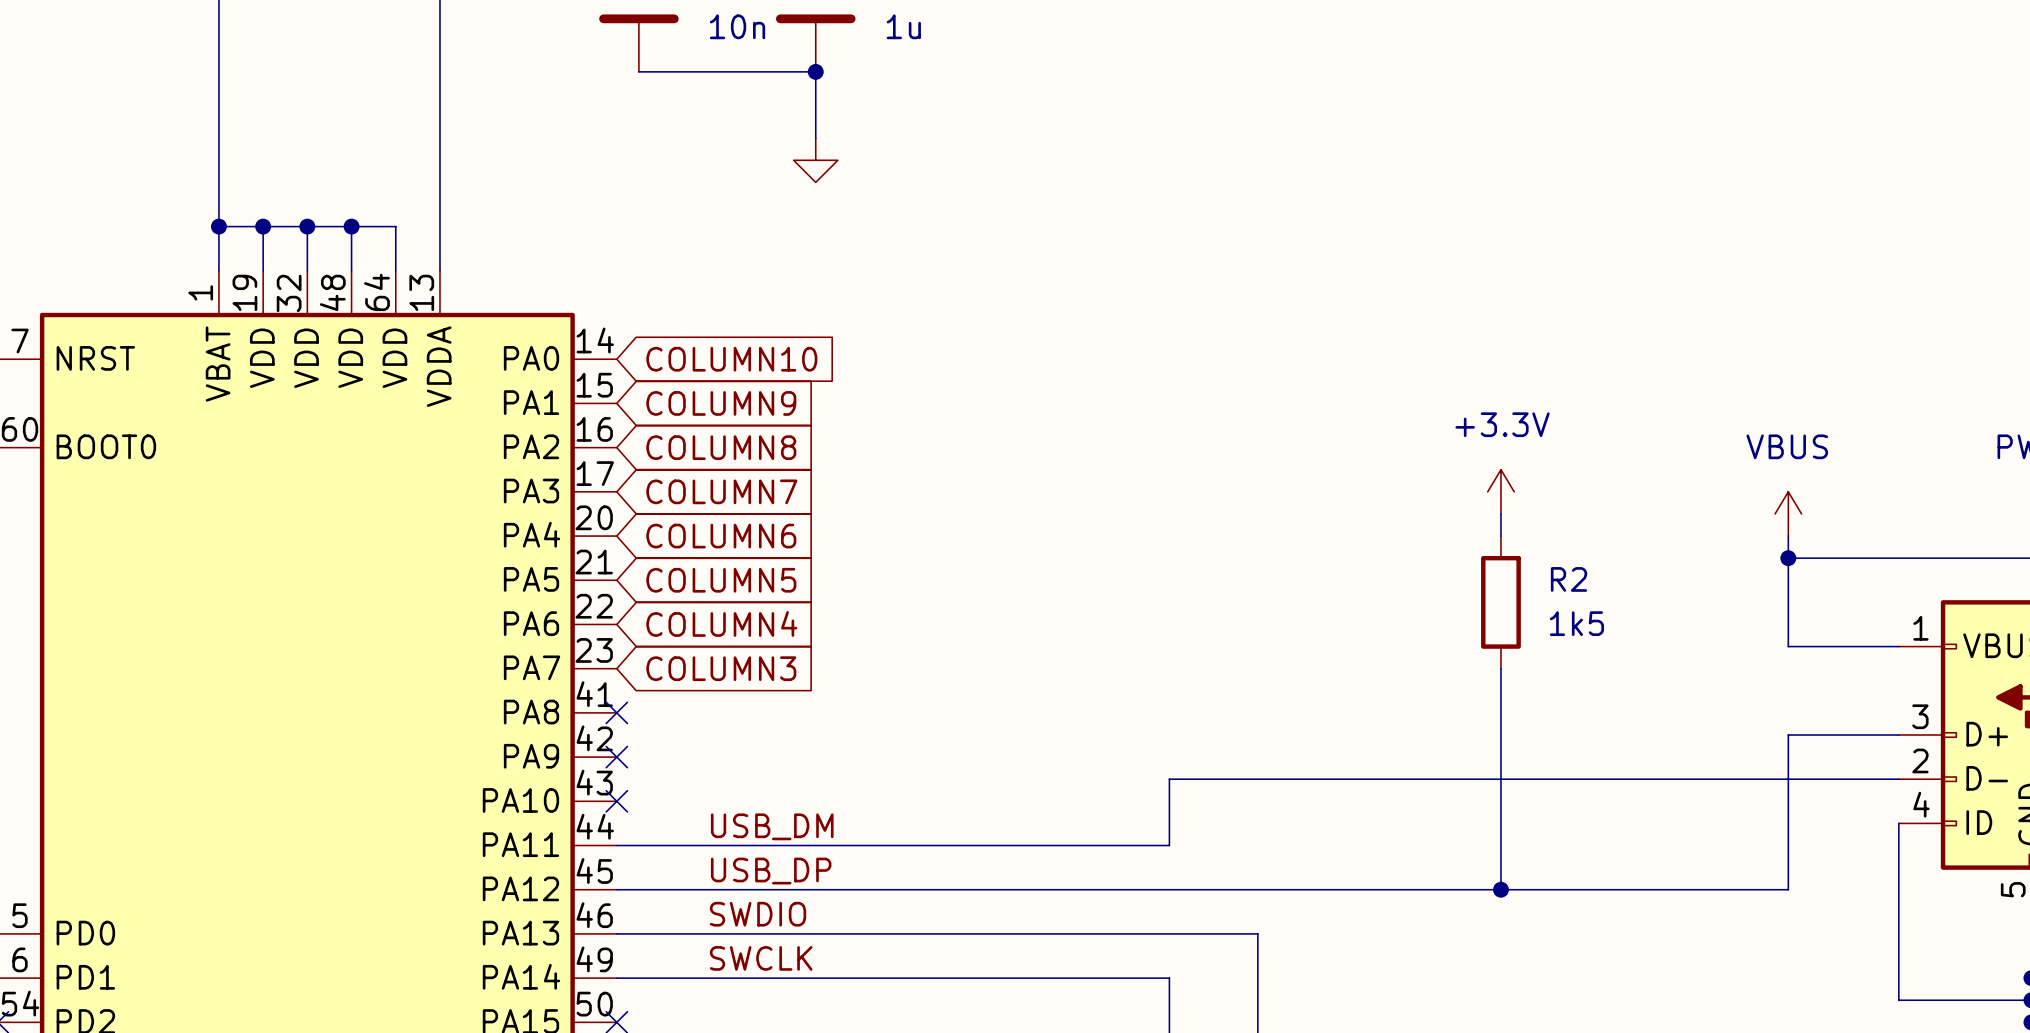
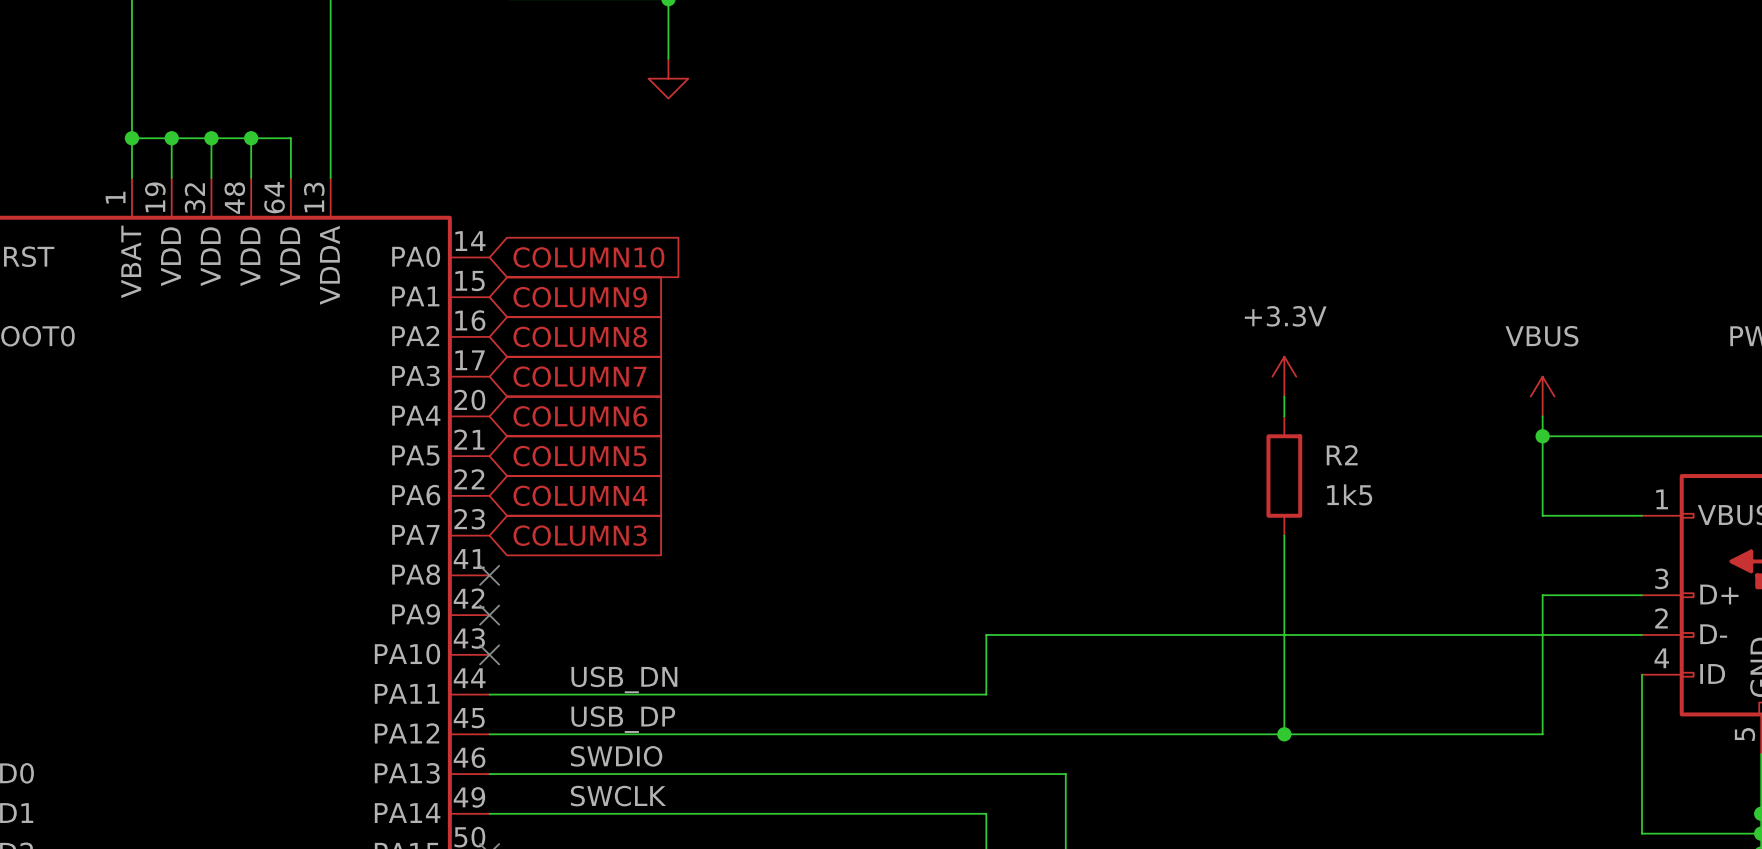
label: USB_DM (772, 826) -> USB_DN (624, 679)

